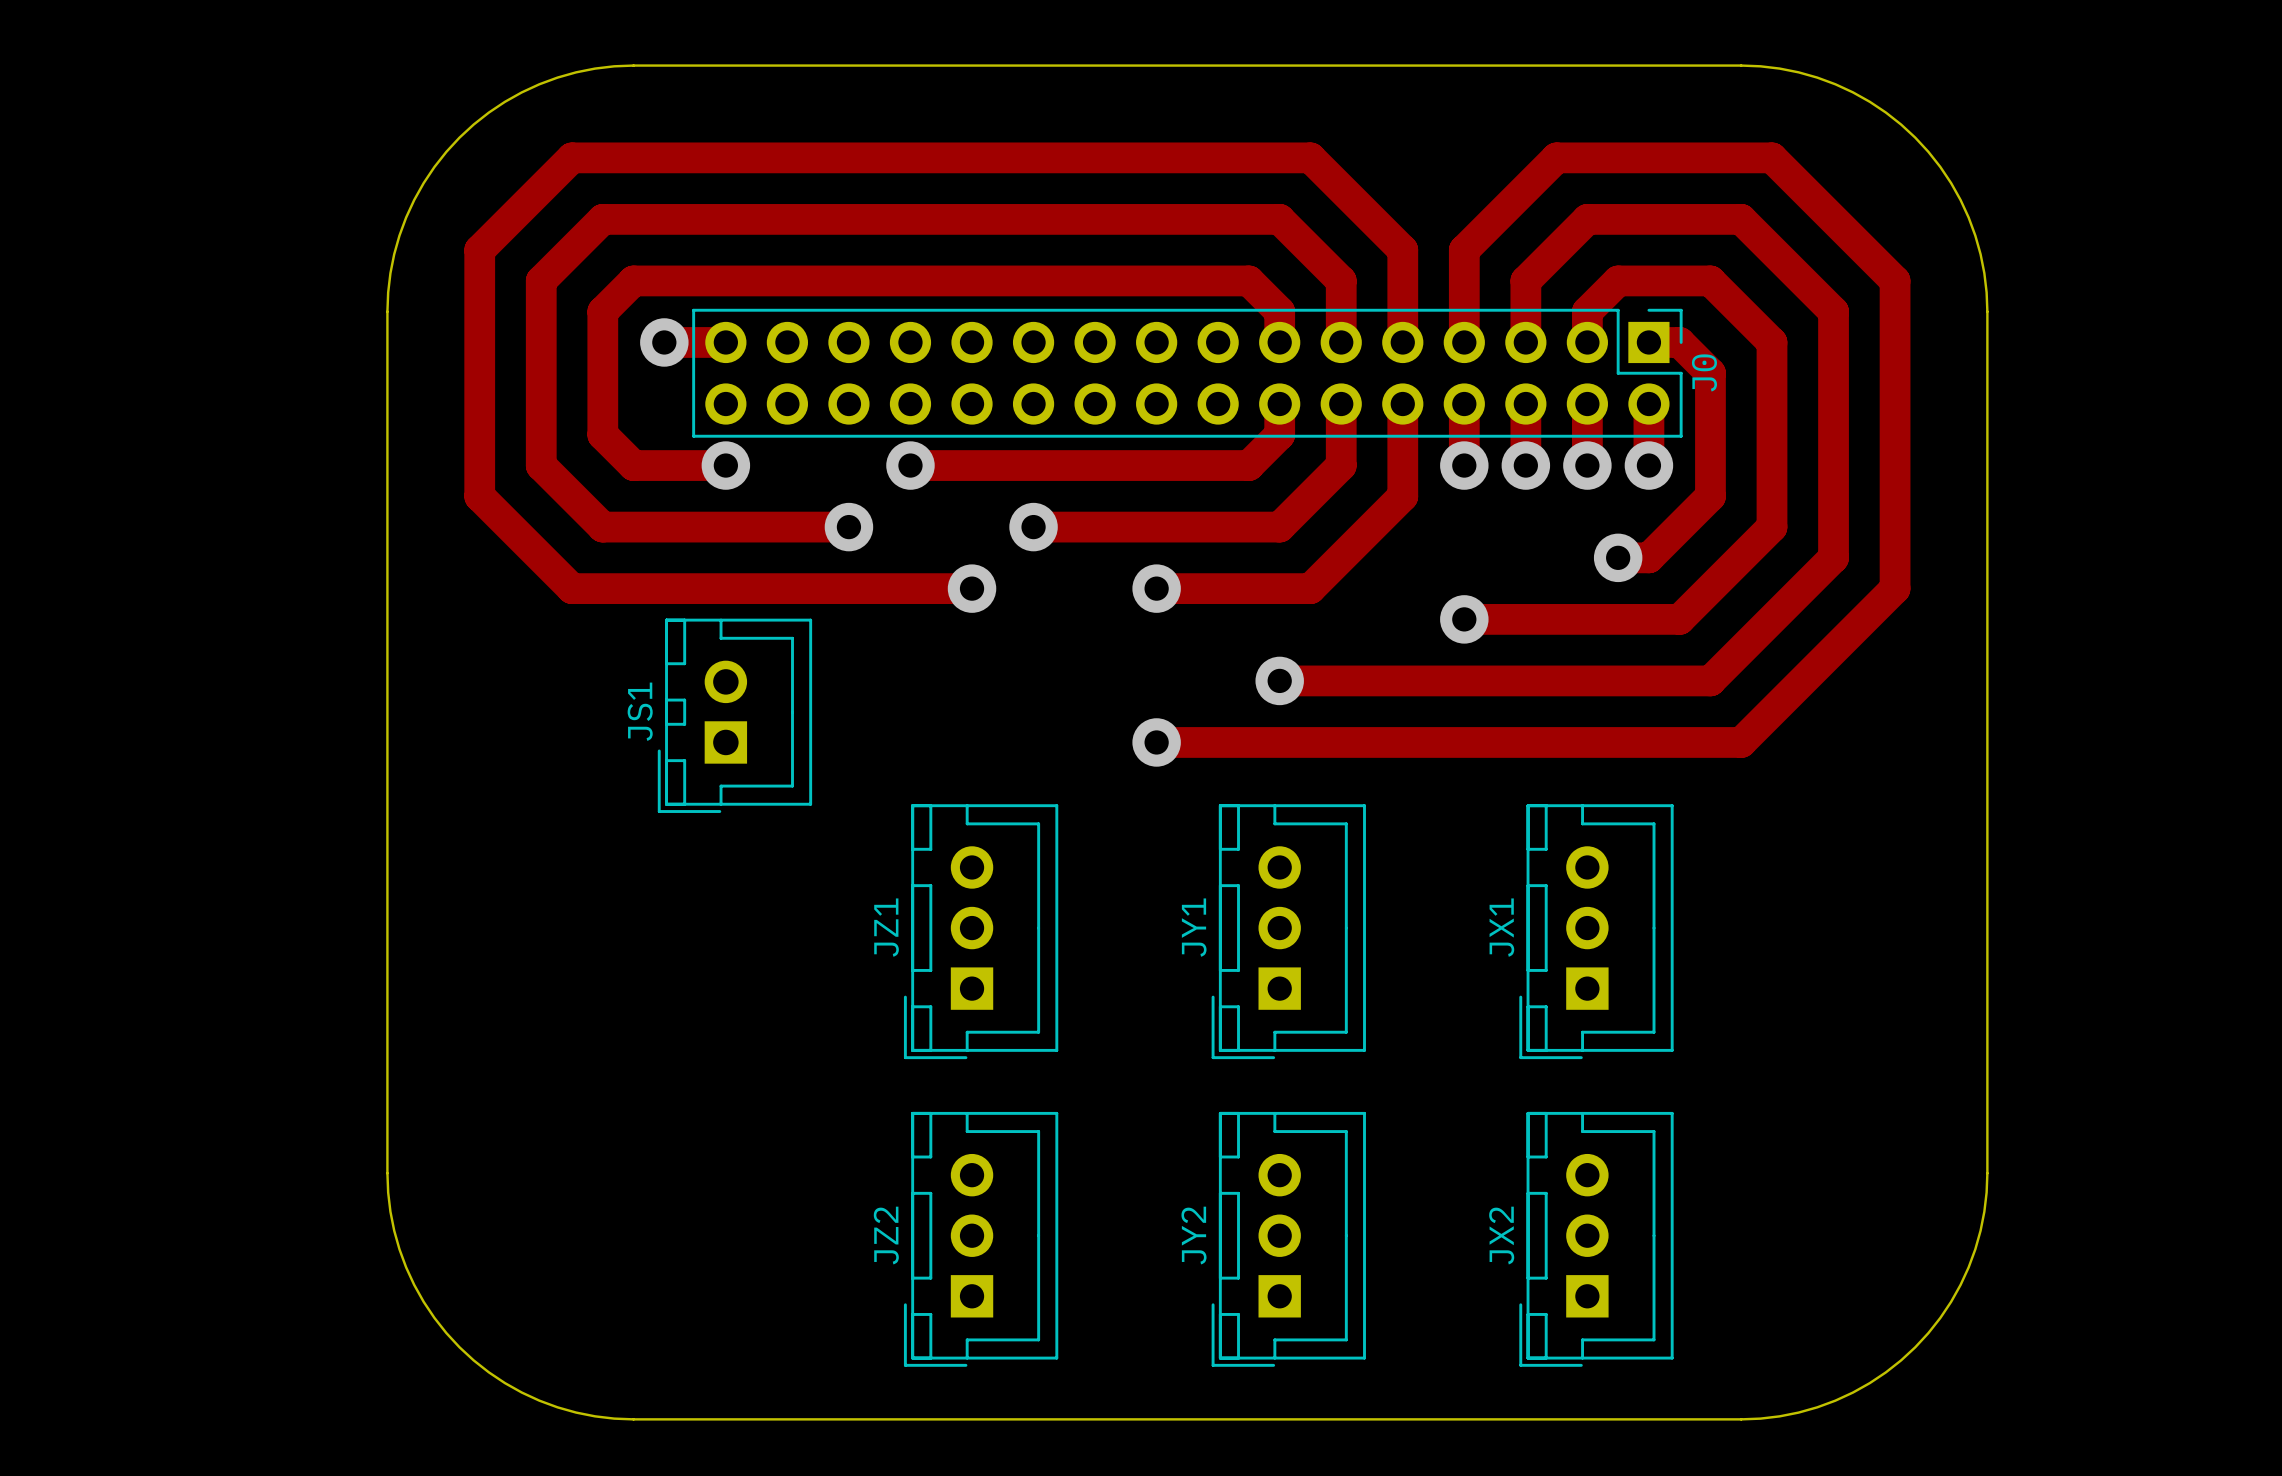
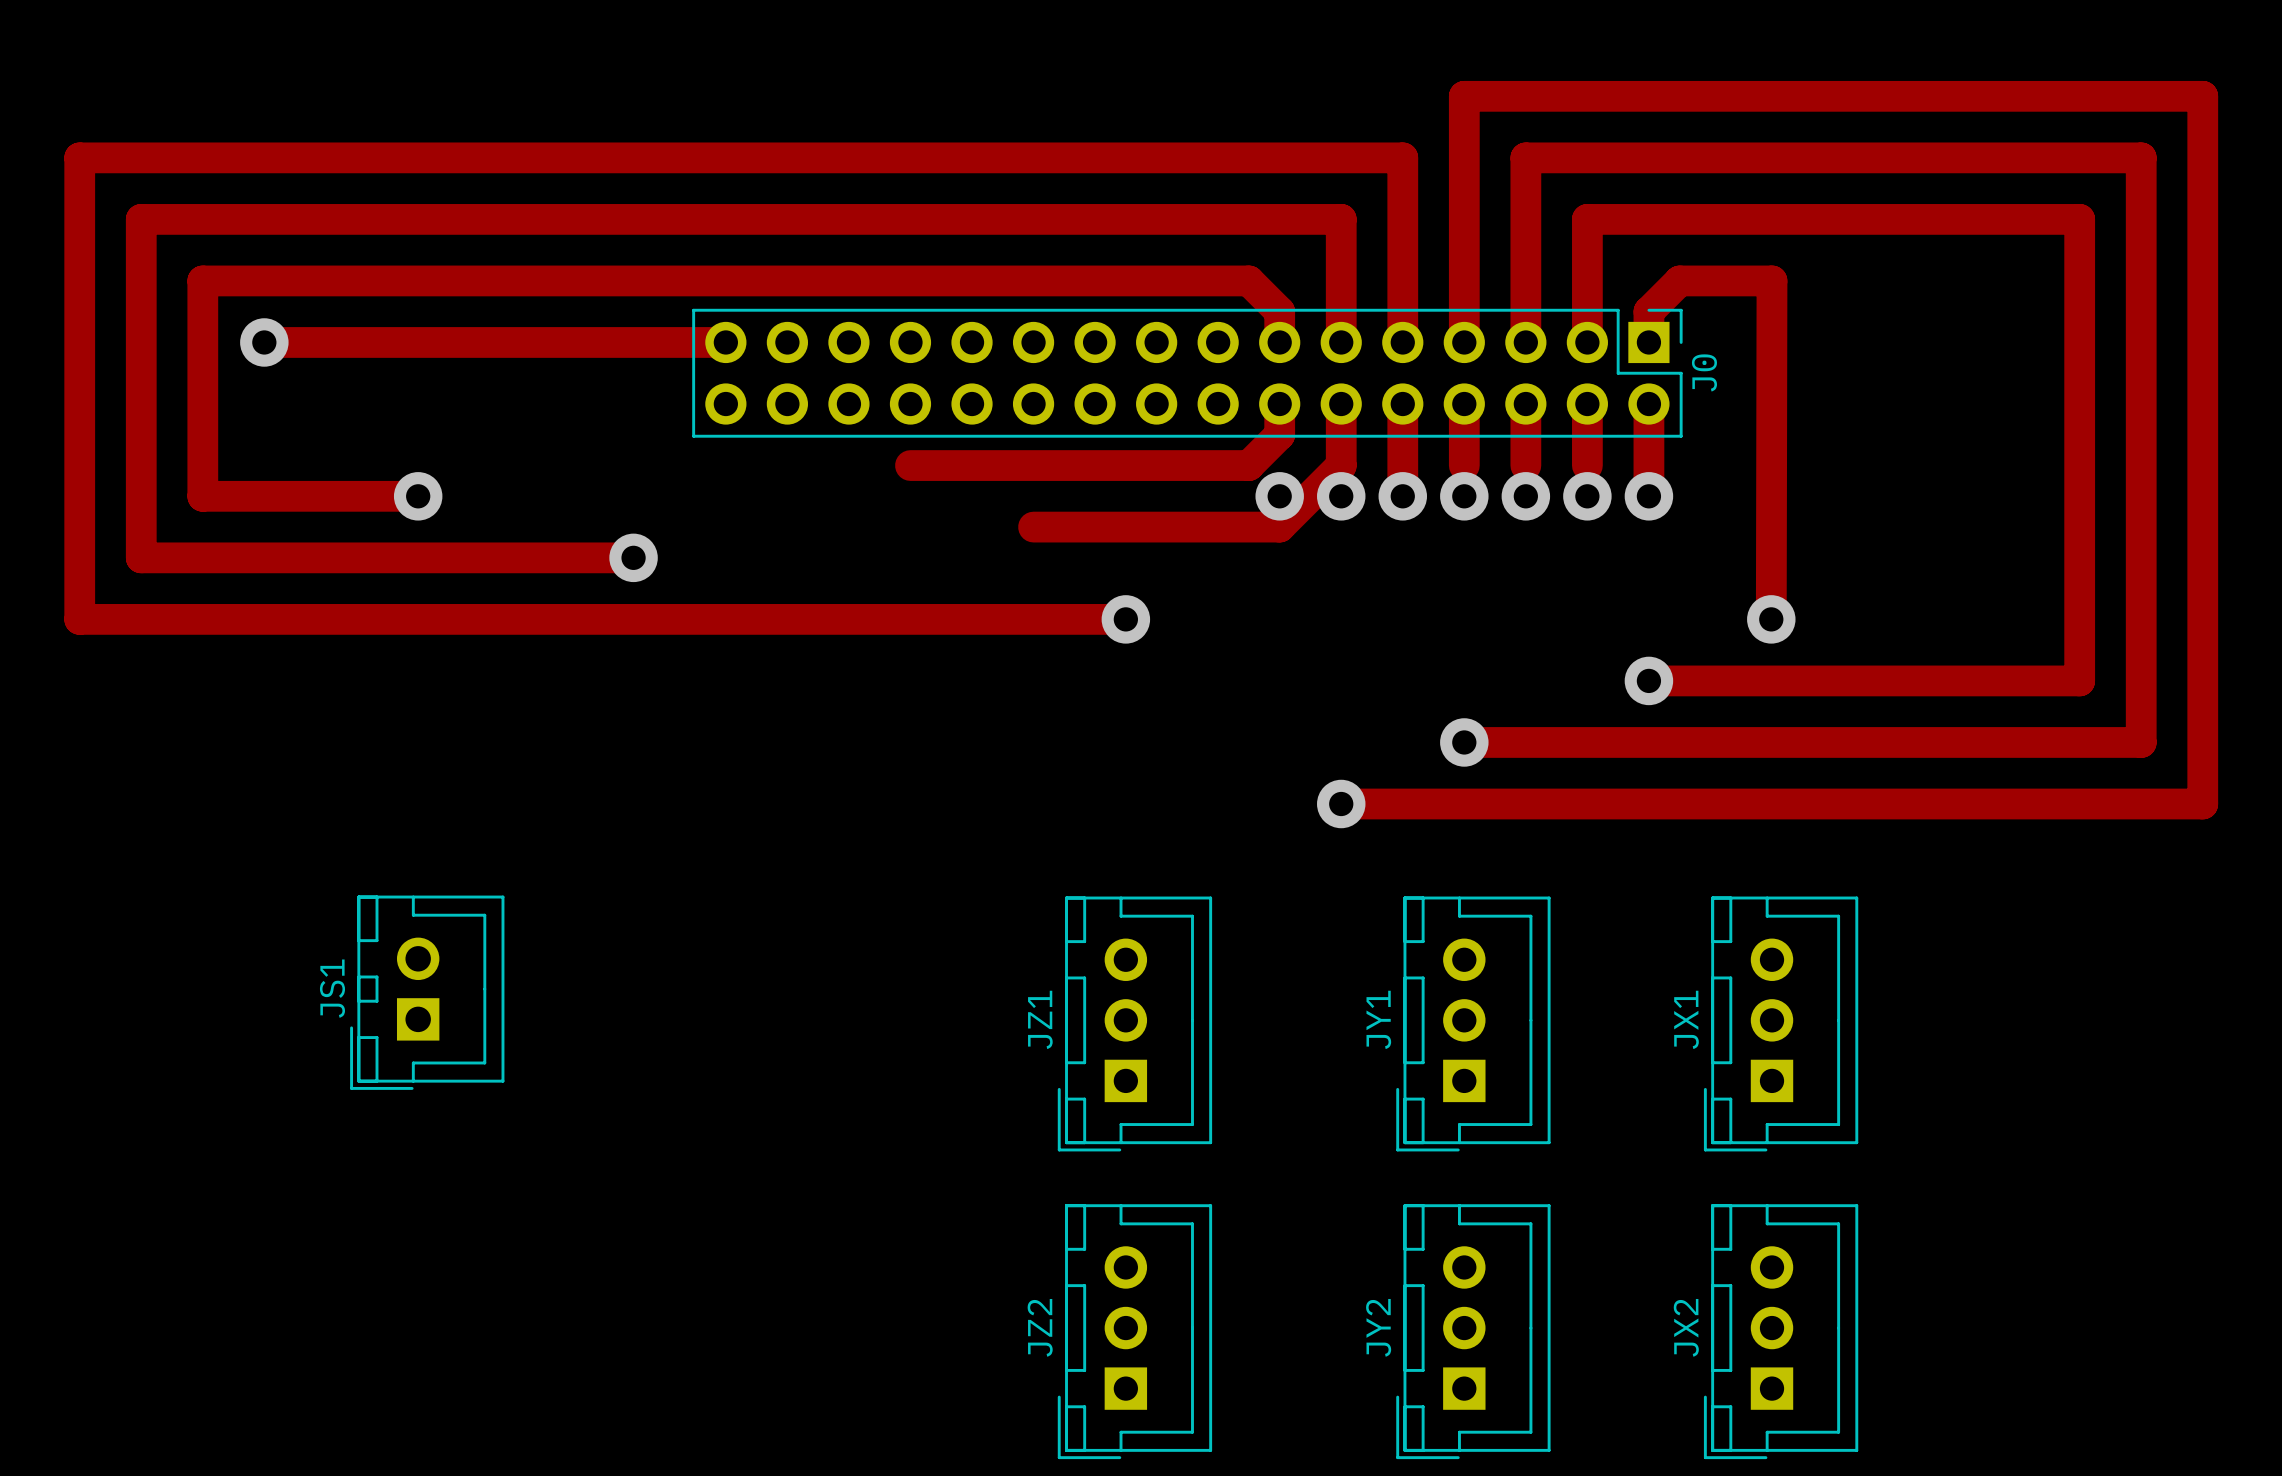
board edge: (633, 65) (1760, 66) (1798, 72) (1817, 77) (1852, 92) (1885, 112) (1915, 137) (1940, 167) (1951, 183) (1968, 217) (1980, 254) (1984, 273) (1987, 311) (1986, 1192) (1980, 1230) (1968, 1267) (1951, 1301) (1940, 1317) (1915, 1347) (1901, 1360) (1869, 1383) (1835, 1400) (1798, 1412) (1760, 1418) (1741, 1419) (614, 1418) (576, 1412) (557, 1407) (521, 1392) (488, 1372) (459, 1347) (434, 1317) (423, 1301) (406, 1267) (394, 1230) (388, 1192) (387, 311) (390, 273) (399, 235) (406, 217) (423, 183) (446, 151) (473, 124) (504, 101) (539, 84) (576, 72) (614, 66) (633, 65) -> none
track: (572, 157) (479, 250) (479, 496) (572, 588) (972, 588) -> (572, 157) (79, 157) (79, 619) (1125, 619)
track: (1310, 157) (1402, 250) -> (1310, 157) (1402, 157) (1402, 250)
track: (1556, 157) (1464, 250) -> (1556, 157) (1525, 157) (1525, 280)
track: (1772, 157) (1895, 280) (1895, 588) (1741, 742) -> (1772, 157) (2141, 157) (2141, 742) (1741, 742)
track: (602, 219) (541, 280) (541, 465) (602, 527) (848, 527) -> (602, 219) (141, 219) (141, 557) (633, 557)
track: (1279, 219) (1341, 280) -> (1279, 219) (1341, 219) (1341, 280)
track: (1587, 219) (1525, 280) -> (1587, 219) (1587, 311)
track: (1741, 219) (1833, 311) (1833, 557) (1710, 680) -> (1741, 219) (2079, 219) (2079, 680) (1710, 680)
track: none -> (1464, 250) (1464, 96) (2202, 96) (2202, 804) (1341, 804)
track: (633, 280) (602, 311) (602, 434) (633, 465) (725, 465) -> (633, 280) (202, 280) (202, 496) (418, 496)
track: (1679, 280) (1618, 280) (1587, 311) -> (1679, 280) (1648, 311) (1648, 342)
track: (1710, 280) (1772, 342) (1772, 527) (1679, 619) (1464, 619) -> (1710, 280) (1772, 280) (1771, 619)
track: none -> (264, 342) (664, 342)
via: none -> (264, 342)
via: (664, 342) -> none
track: (1648, 342) (1679, 342) (1710, 373) (1710, 496) (1648, 557) (1618, 557) -> none
via: (725, 465) -> none
via: (910, 465) -> none
via position: (1464, 465) -> (1464, 496)
via position: (1525, 465) -> (1525, 496)
via position: (1587, 465) -> (1587, 496)
via position: (1648, 465) -> (1648, 496)
via: none -> (418, 496)
via: none -> (1279, 496)
via: none -> (1341, 496)
track: (1402, 496) (1310, 588) (1156, 588) -> none
via: none -> (1402, 496)
via: (848, 527) -> none
via: (1033, 527) -> none
via: none -> (633, 557)
via: (1618, 557) -> none
via: (972, 588) -> none
via position: (1156, 588) -> (1125, 619)
via: (1464, 619) -> none
via: none -> (1771, 619)
track: (1279, 680) (1648, 680) -> none
via: (1279, 680) -> none
via: none -> (1648, 680)
JS1 position: (734, 715) -> (427, 992)
track: (1156, 742) (1464, 742) -> none
via: (1156, 742) -> none
via: none -> (1464, 742)
via: none -> (1341, 804)
JZ1 position: (981, 931) -> (1134, 1023)
JY1 position: (1288, 931) -> (1473, 1023)
JX1 position: (1596, 931) -> (1781, 1023)
JZ2 position: (981, 1239) -> (1134, 1331)
JY2 position: (1288, 1239) -> (1473, 1331)
JX2 position: (1596, 1239) -> (1781, 1331)

